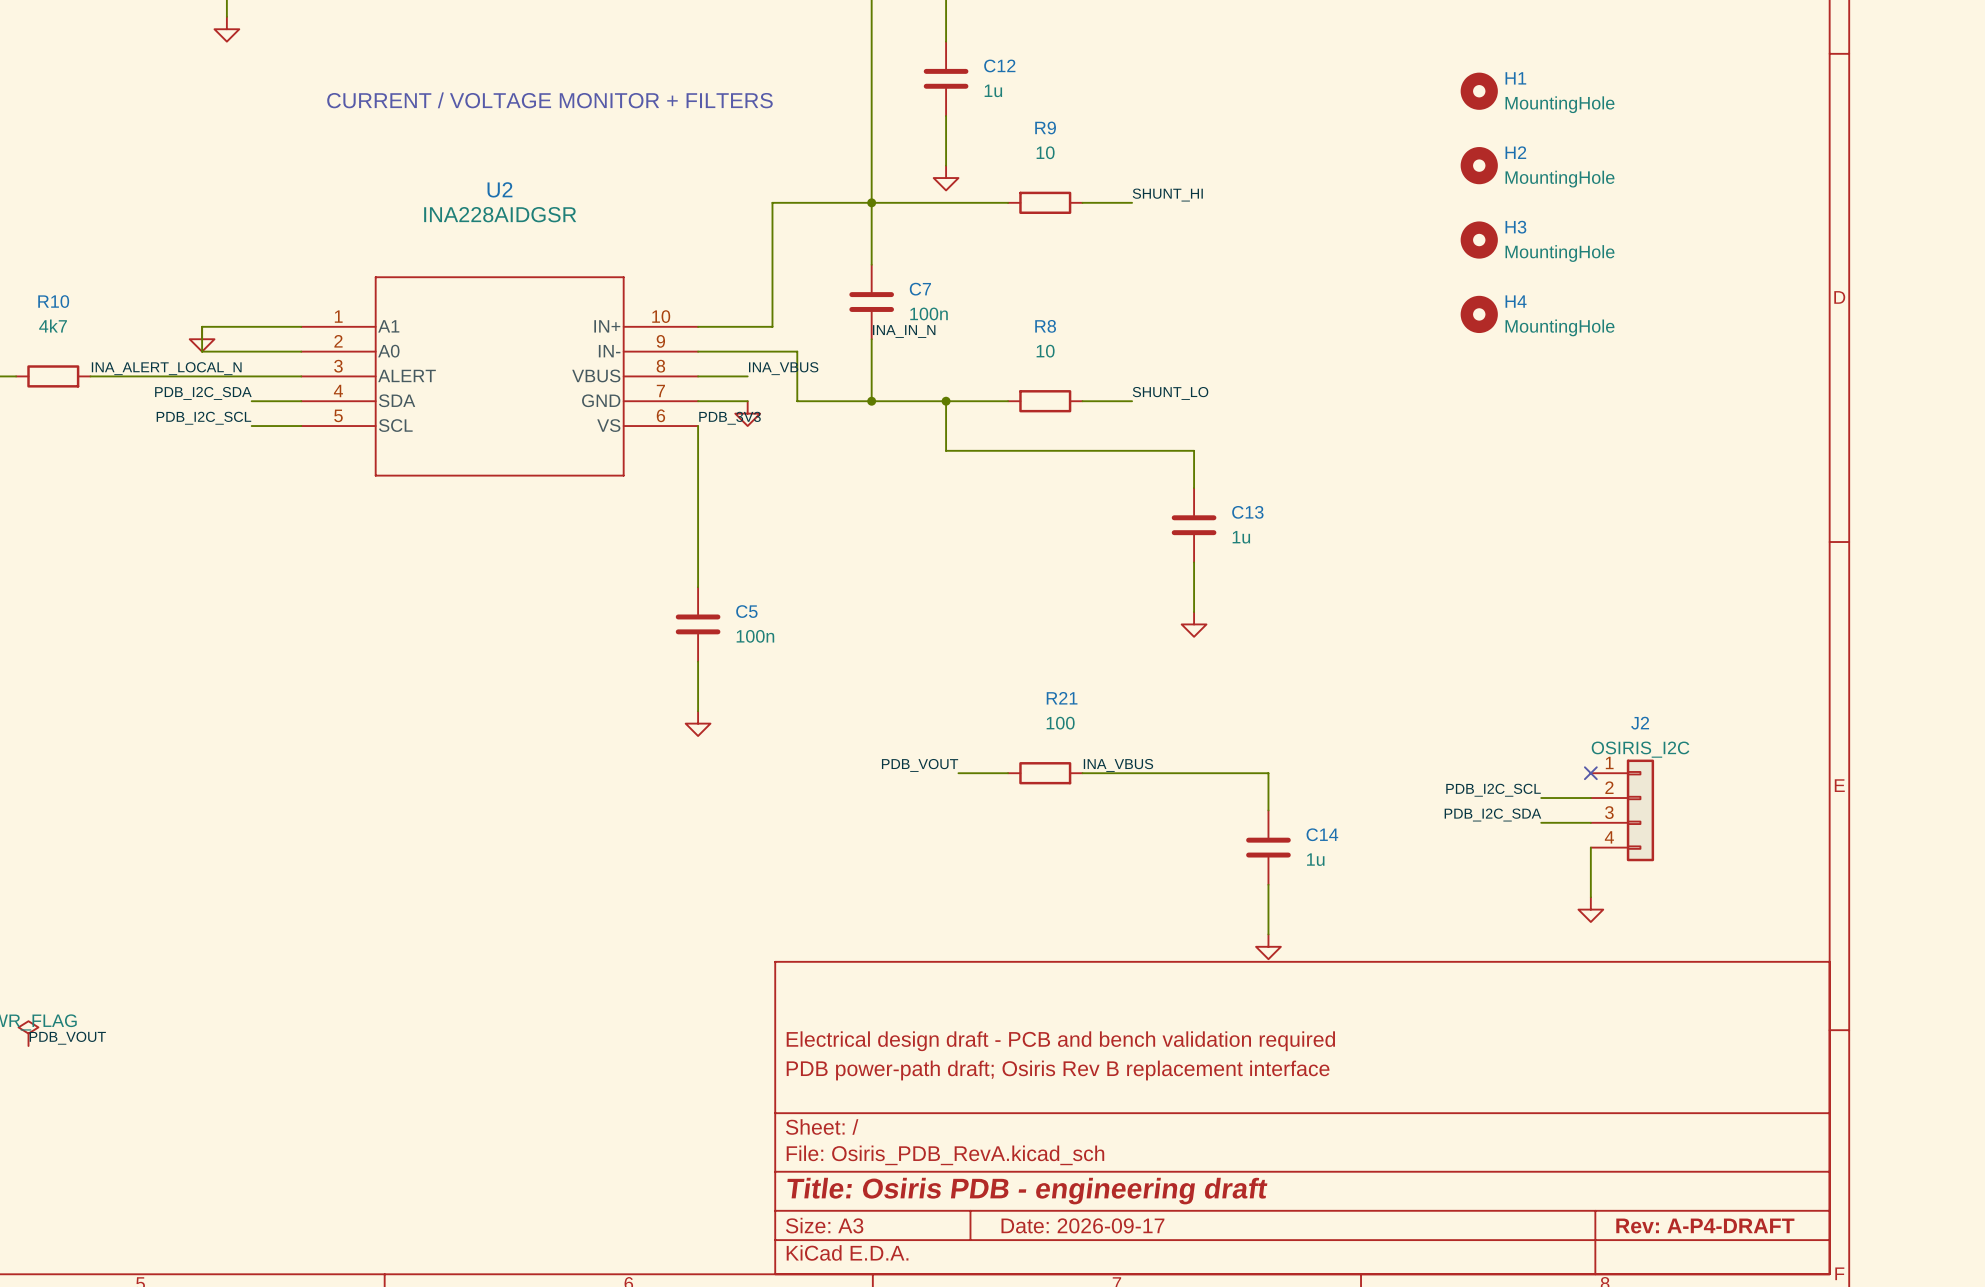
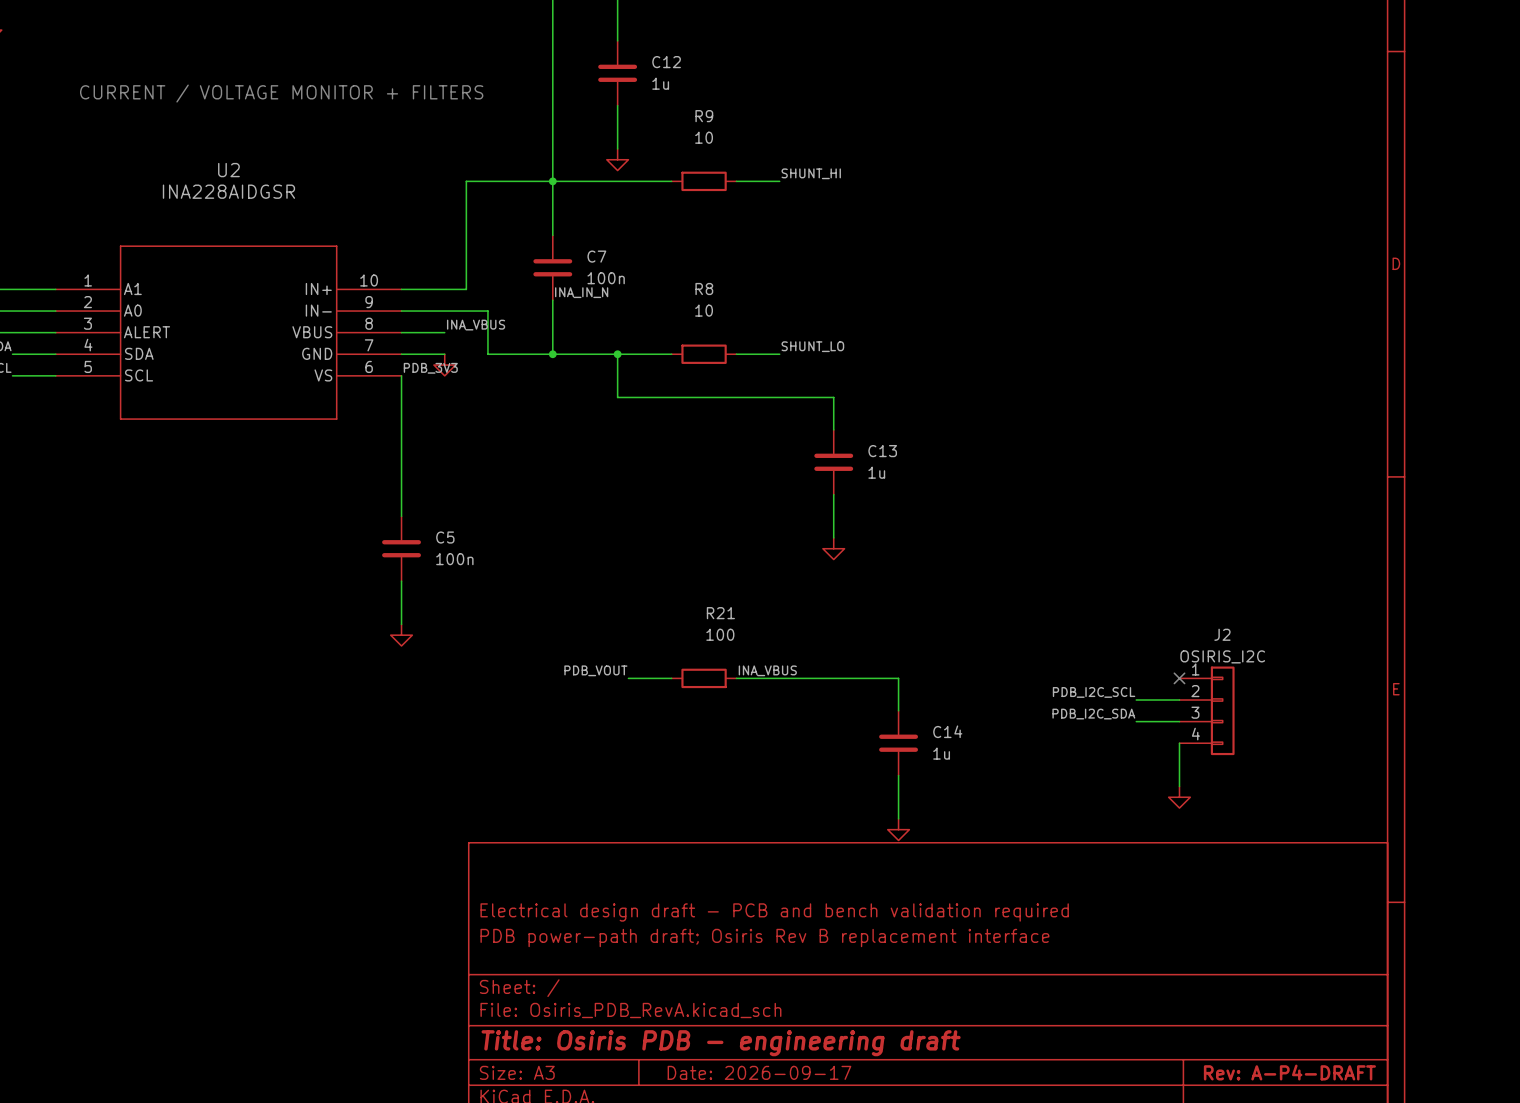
H1: MountingHole (1479, 91) -> none
H2: MountingHole (1479, 165) -> none
H3: MountingHole (1479, 240) -> none
H4: MountingHole (1479, 314) -> none

